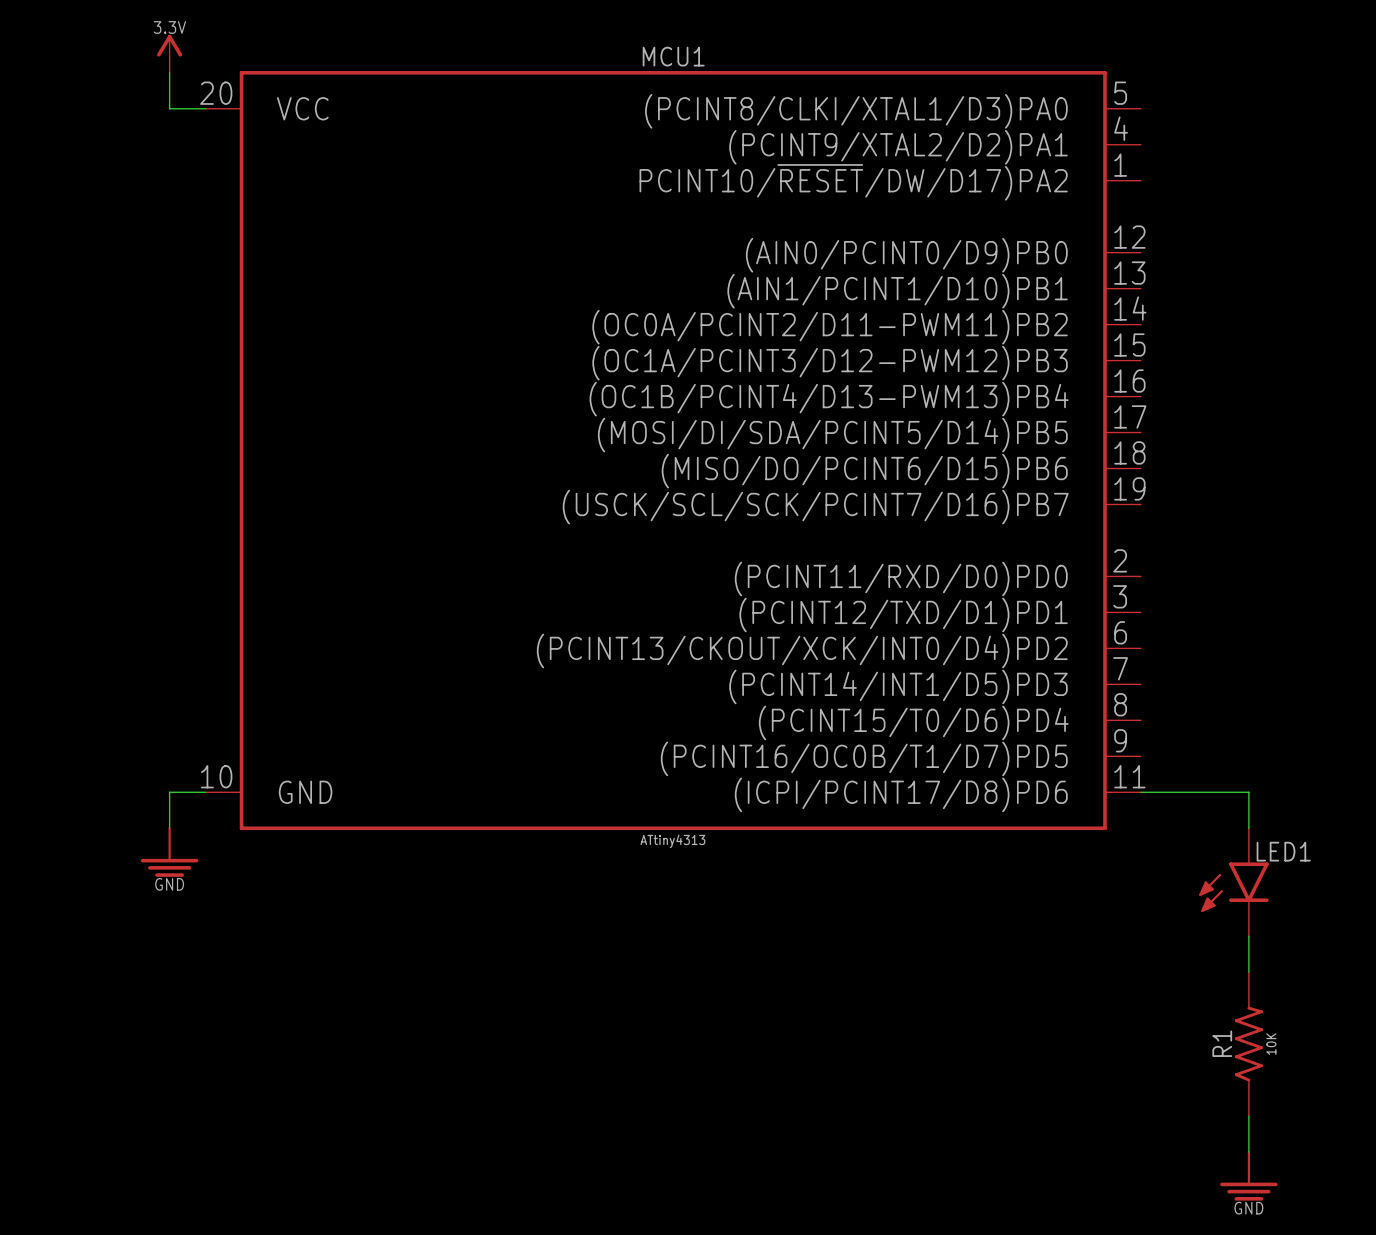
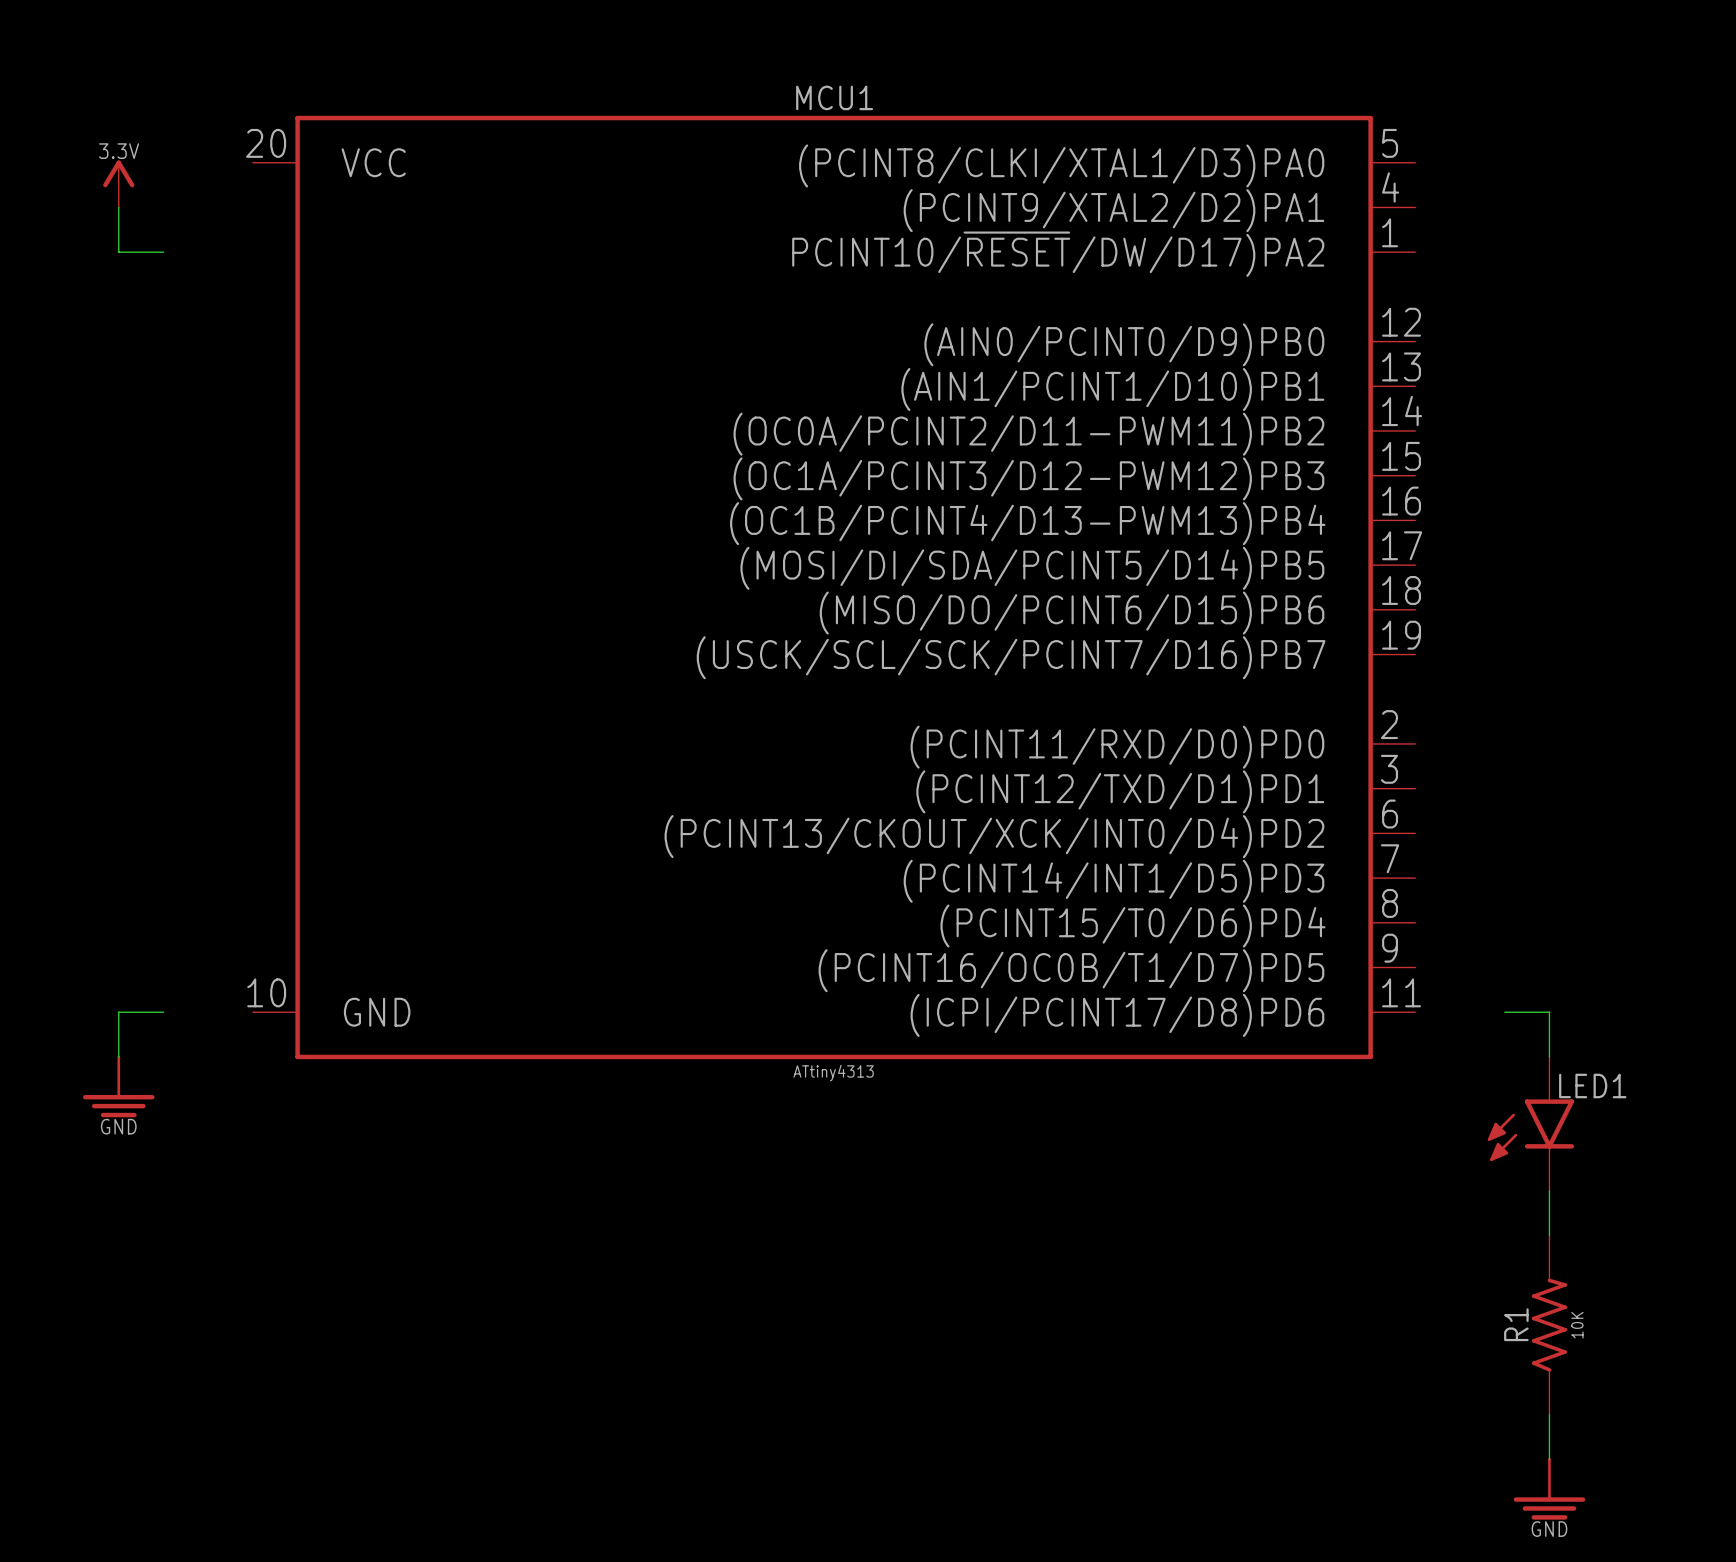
power symbol position: (169, 53) -> (118, 183)
wire: (169, 72) (169, 108) (205, 108) -> (118, 207) (118, 252) (163, 252)
wire: (205, 792) (169, 792) (169, 828) -> (163, 1012) (118, 1012) (118, 1056)
wire: (1140, 792) (1212, 792) -> none
power symbol position: (169, 852) -> (118, 1086)

